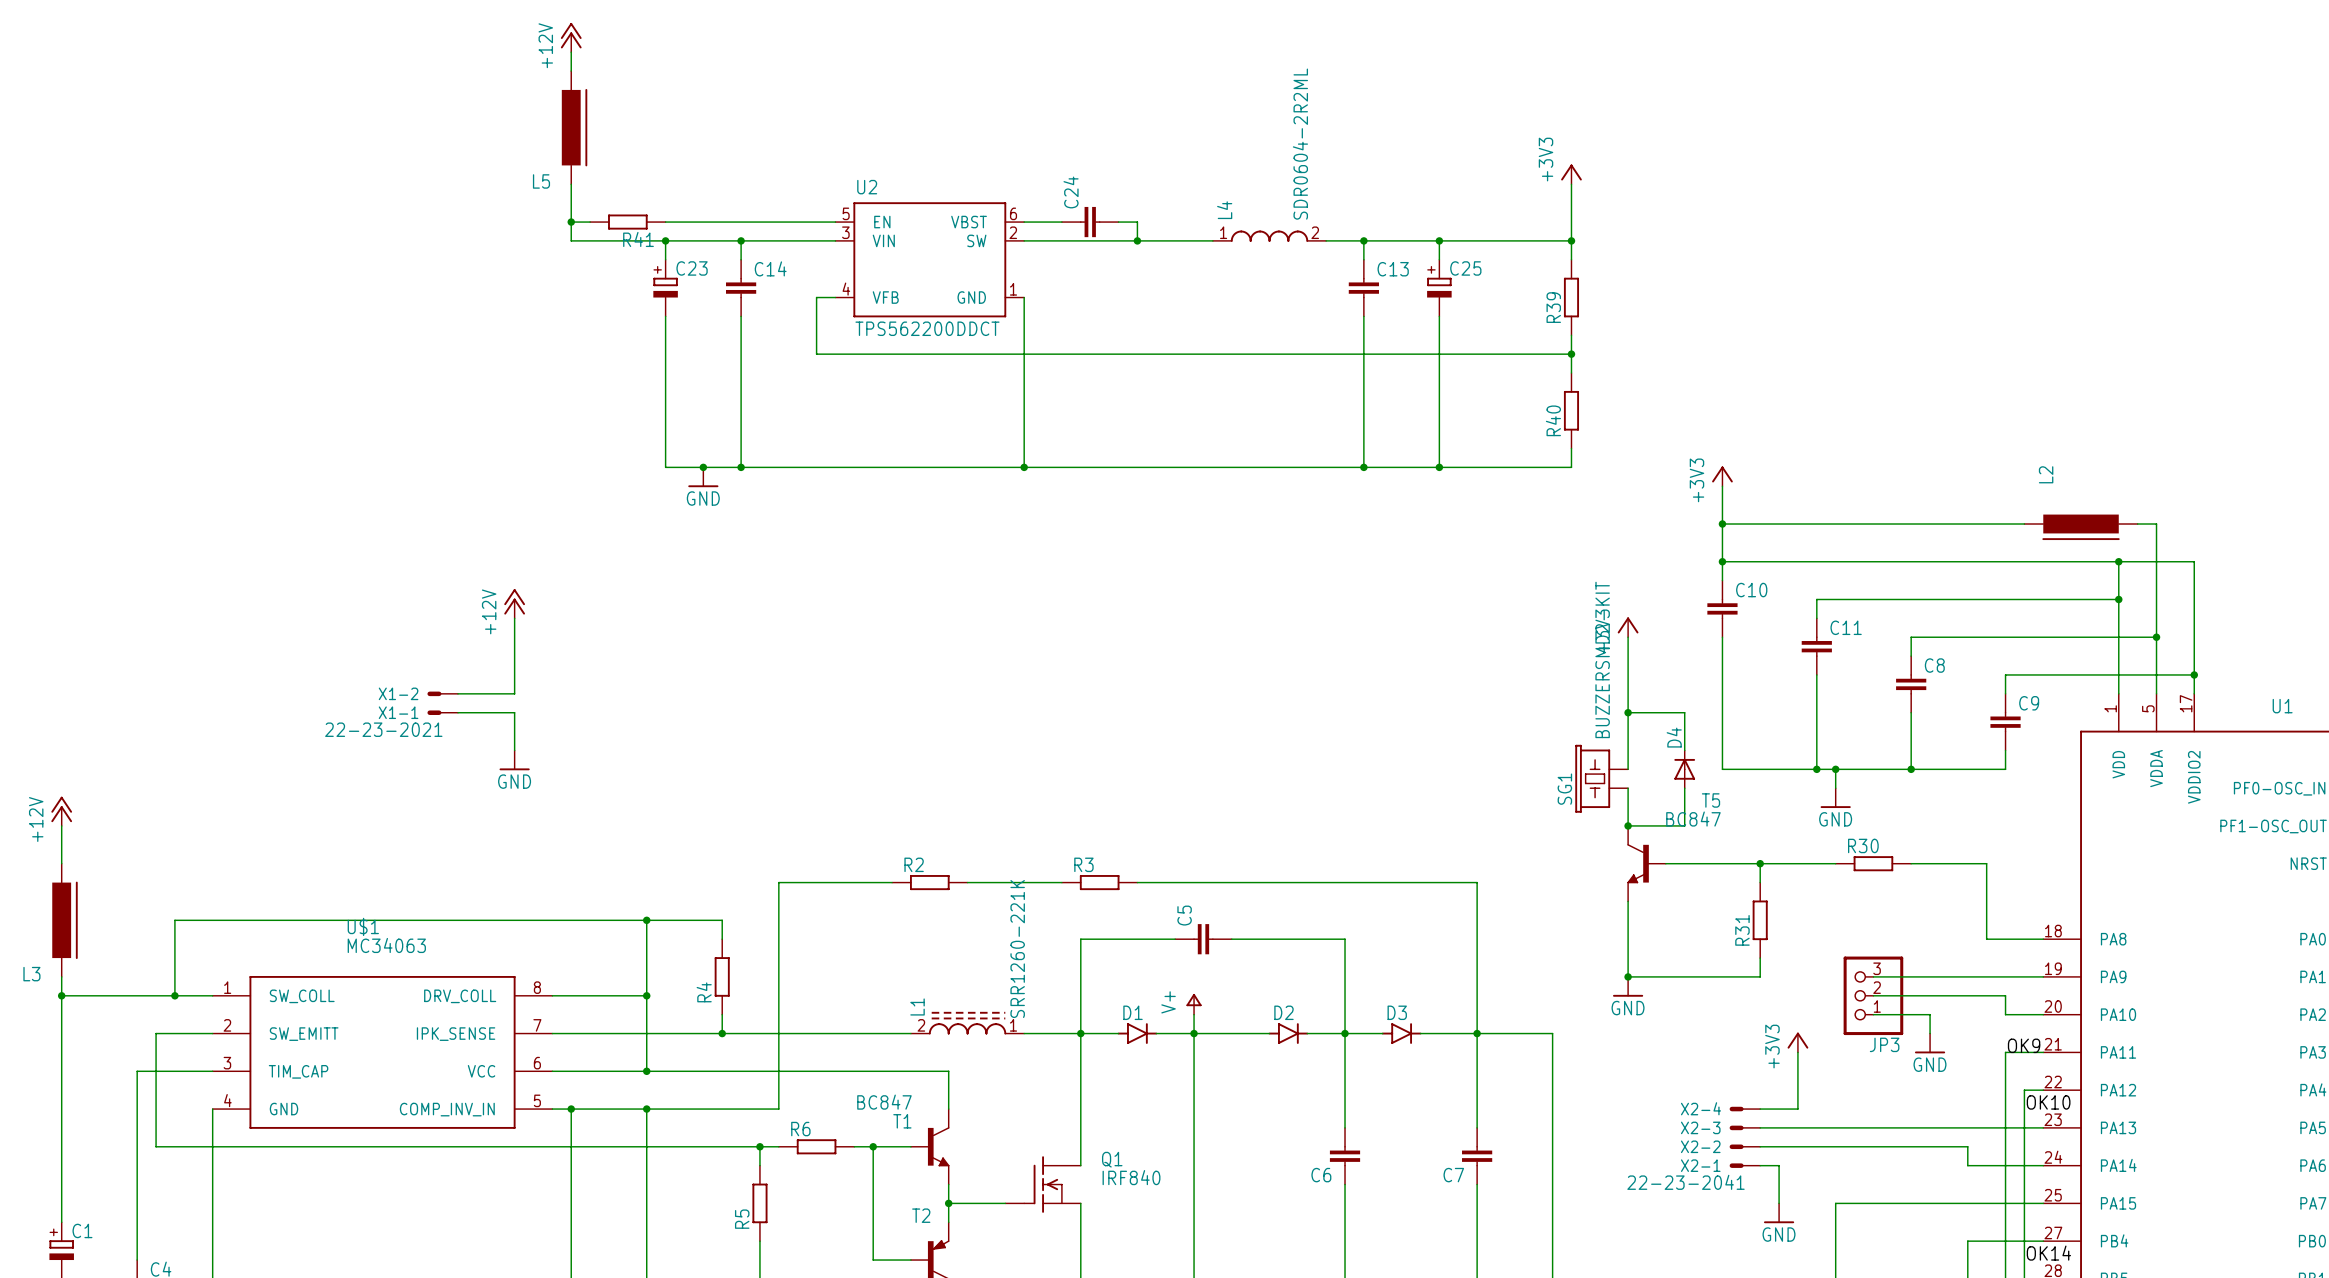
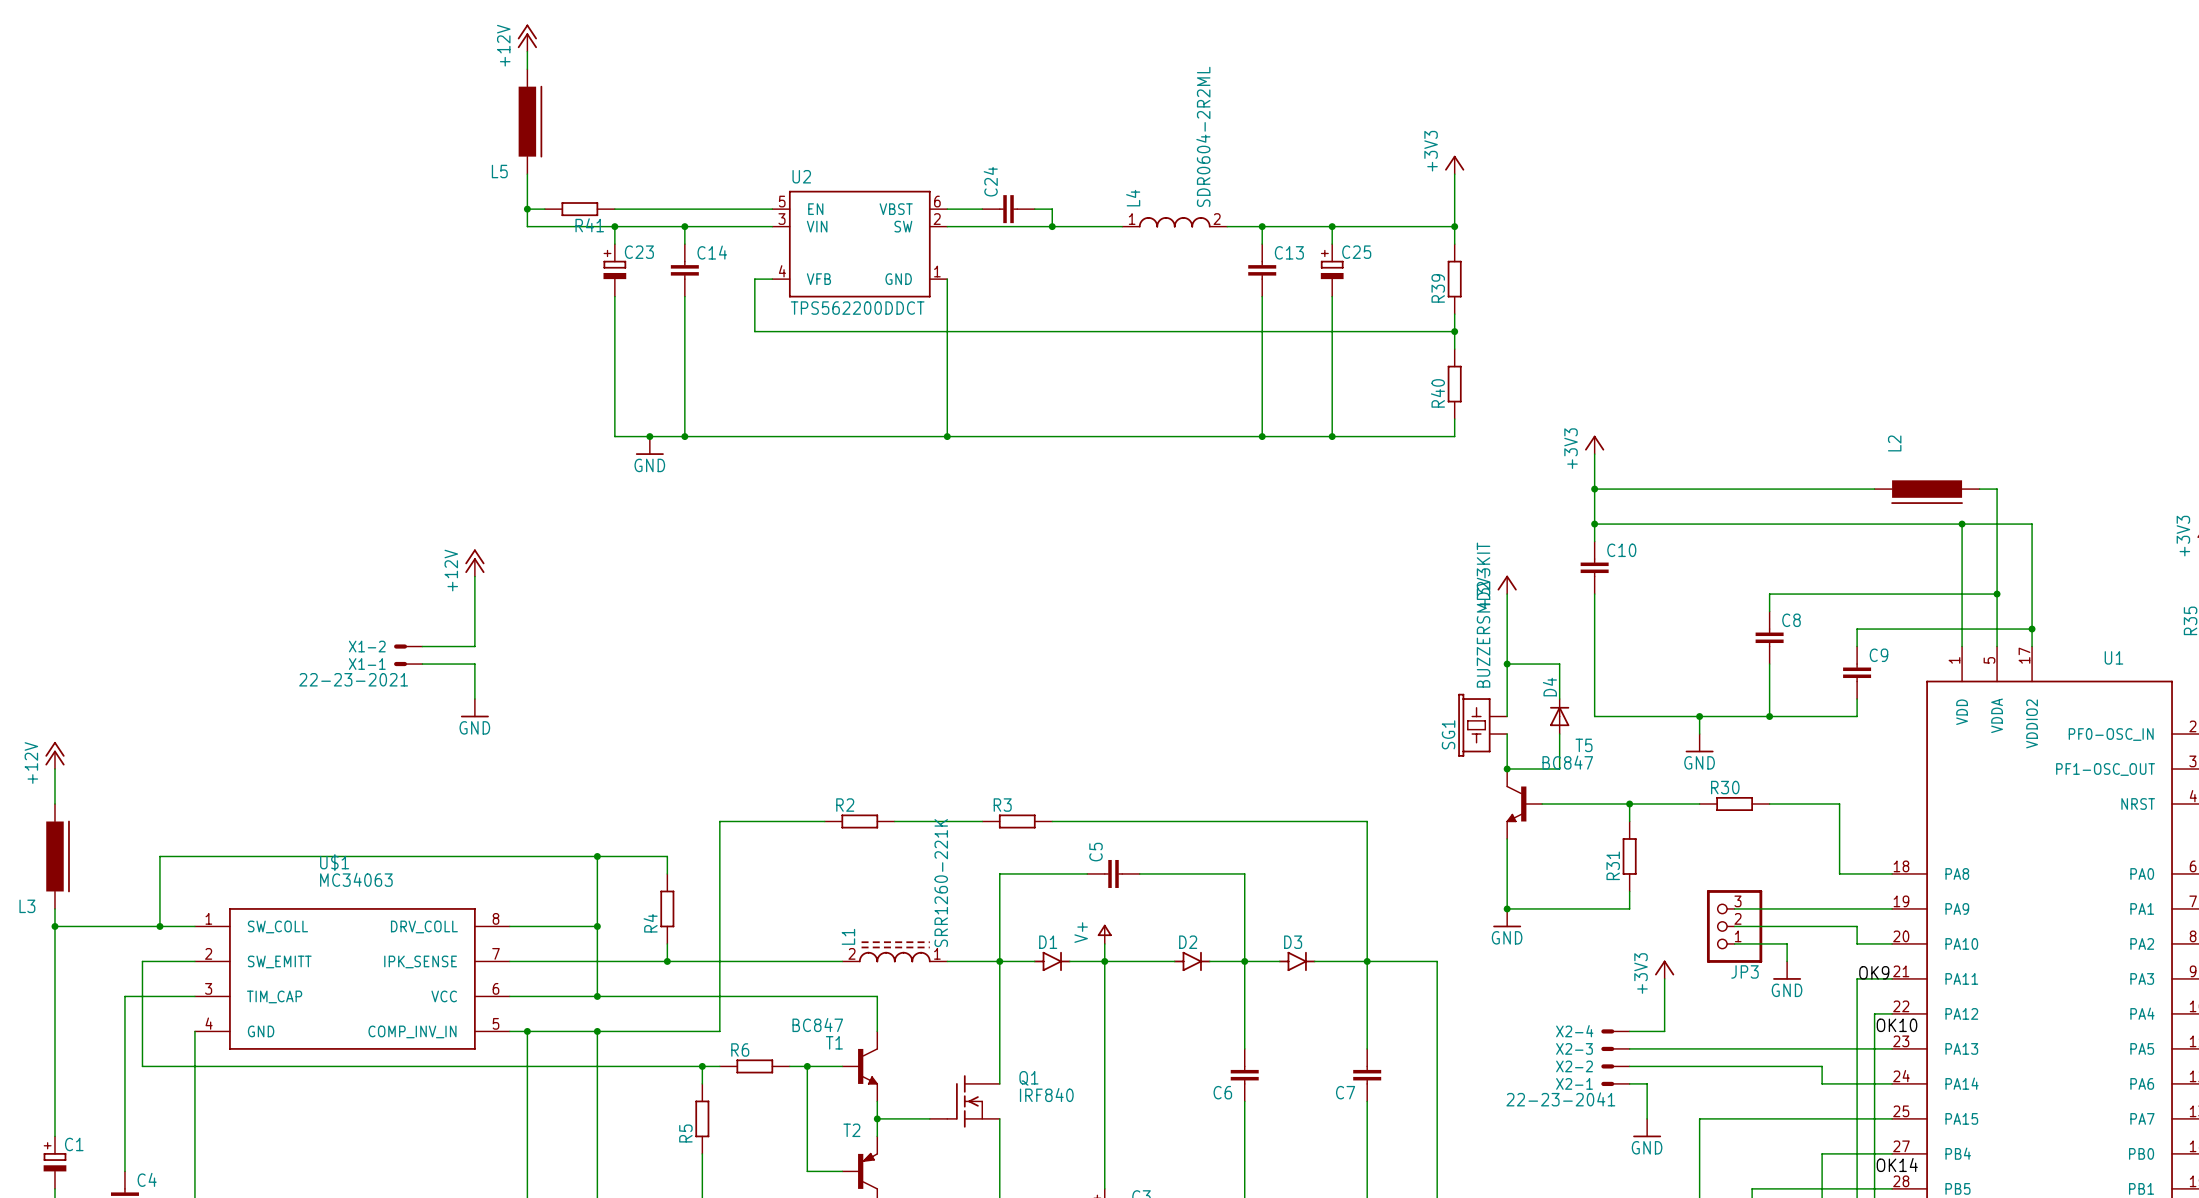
wire: (2118, 599) (1816, 599) (1816, 618) -> none
junction: (2118, 599) -> none
C11: (1816, 646) -> none
wire: (1816, 674) (1816, 769) -> none
junction: (1816, 769) -> none

